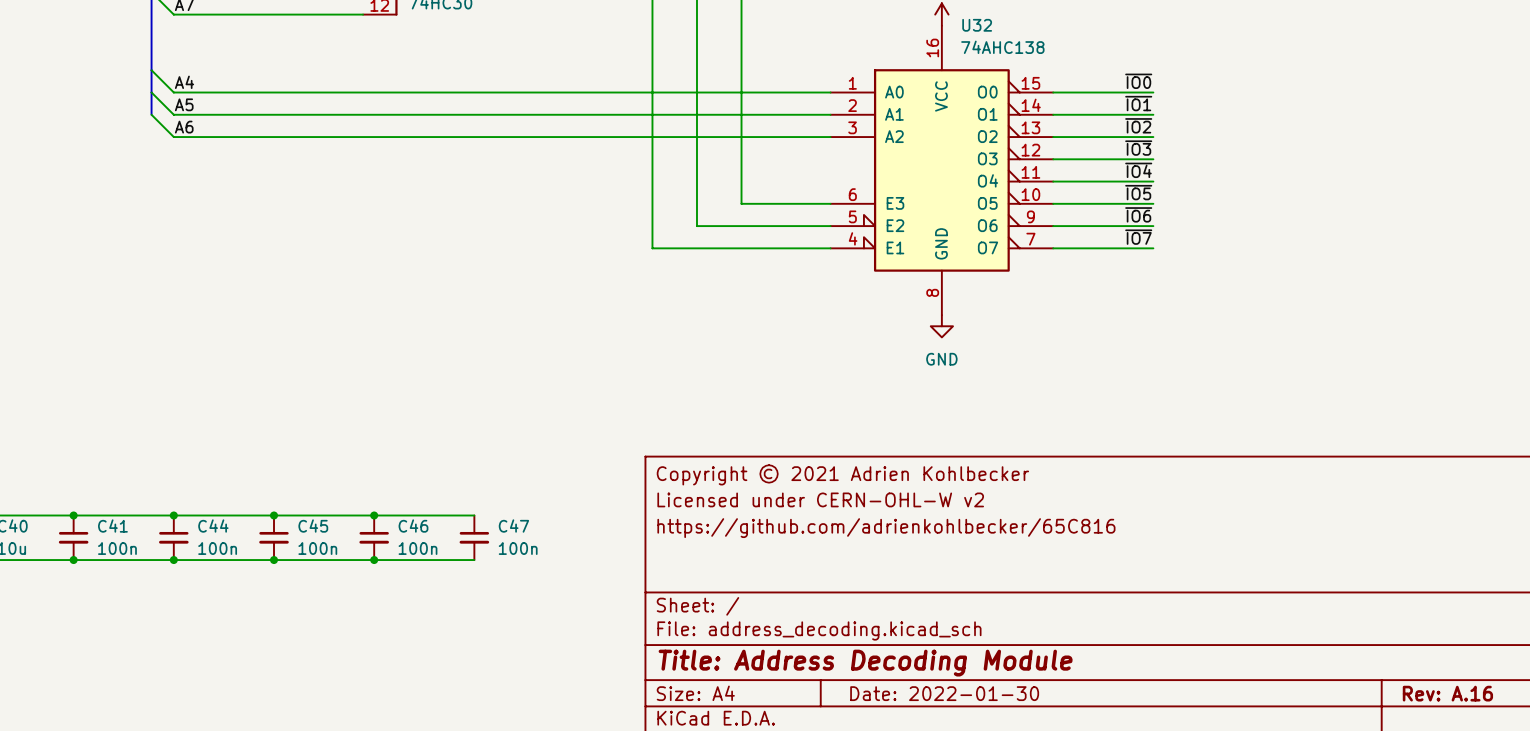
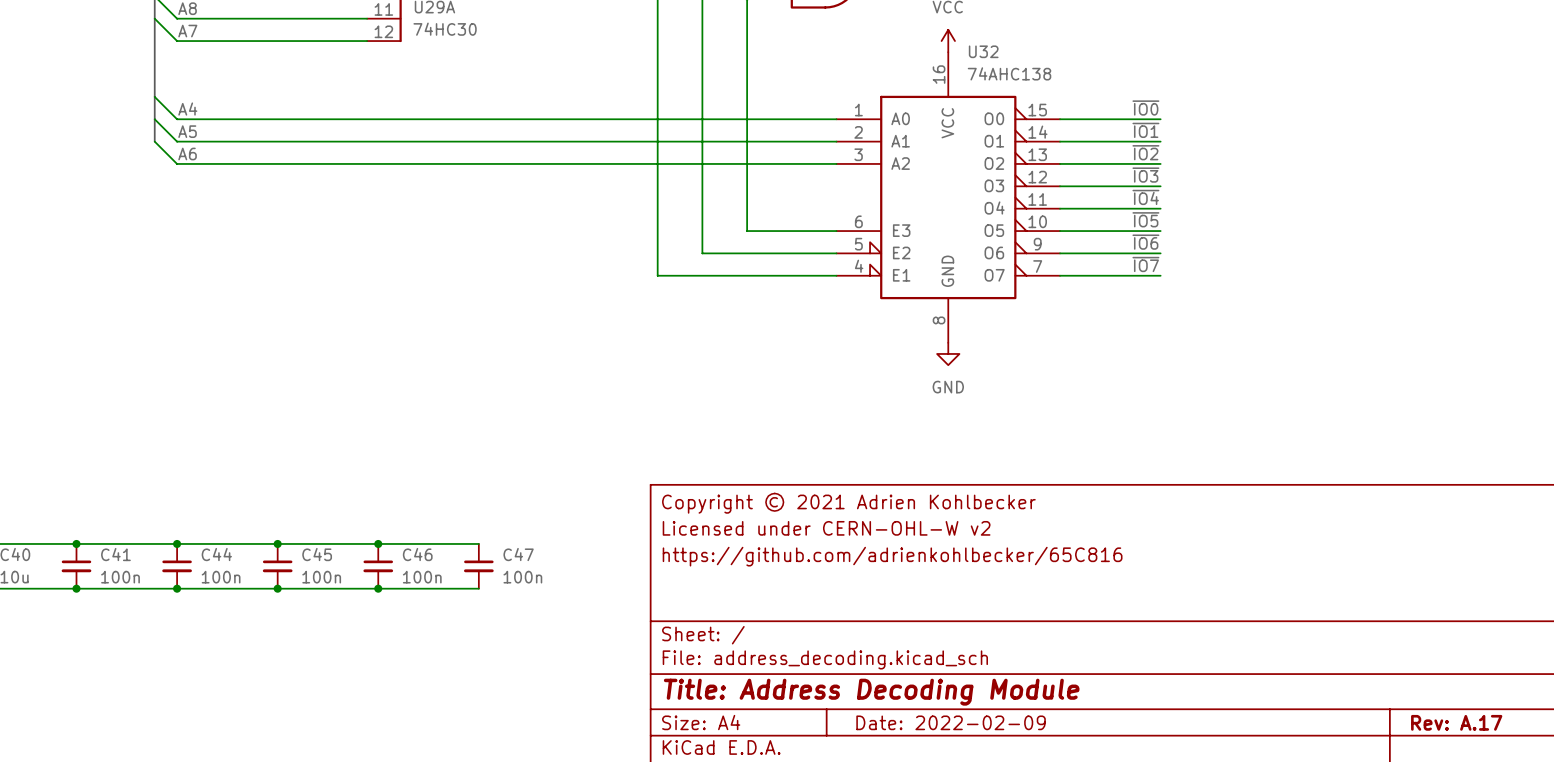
title block: Date: 2022-01-30 (944, 693) -> Date: 2022-02-09 (951, 722)
title block: Rev: A.16 (1447, 693) -> Rev: A.17 (1456, 722)

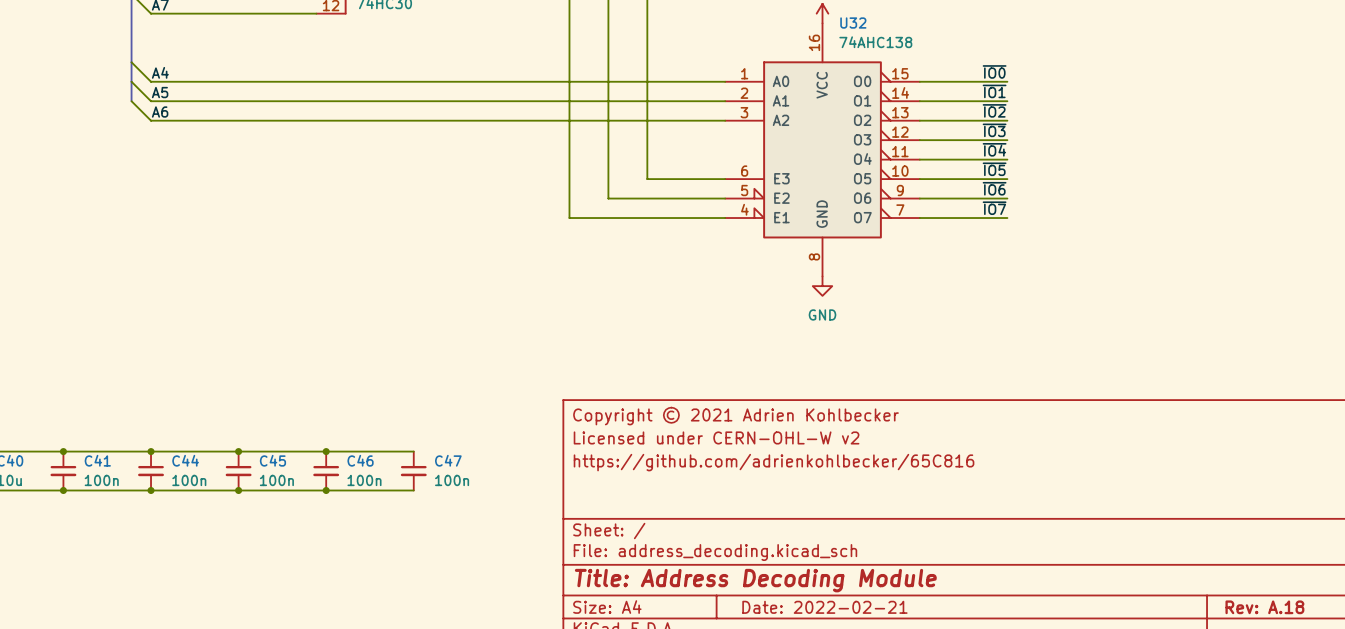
title block: Date: 2022-02-09 (951, 722) -> Date: 2022-02-21 (824, 607)
title block: Rev: A.17 (1456, 722) -> Rev: A.18 (1264, 607)

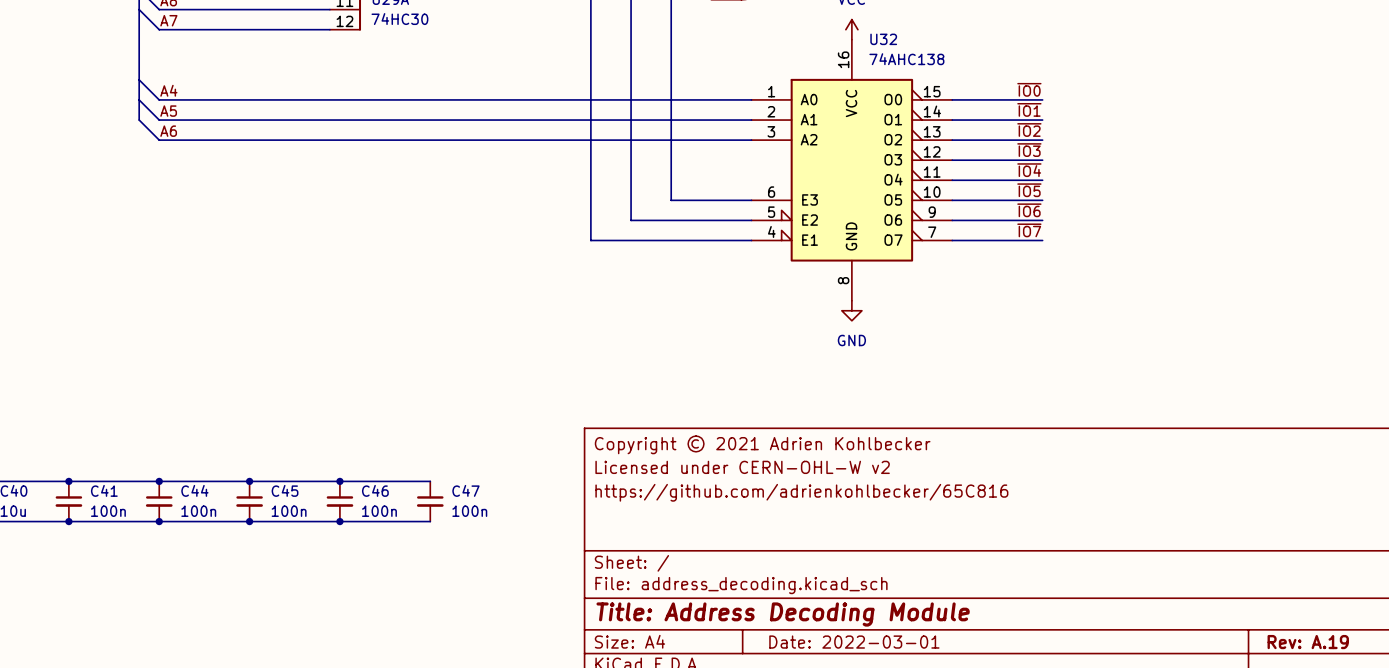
title block: Date: 2022-02-21 (824, 607) -> Date: 2022-03-01 (854, 642)
title block: Rev: A.18 (1264, 607) -> Rev: A.19 (1308, 642)

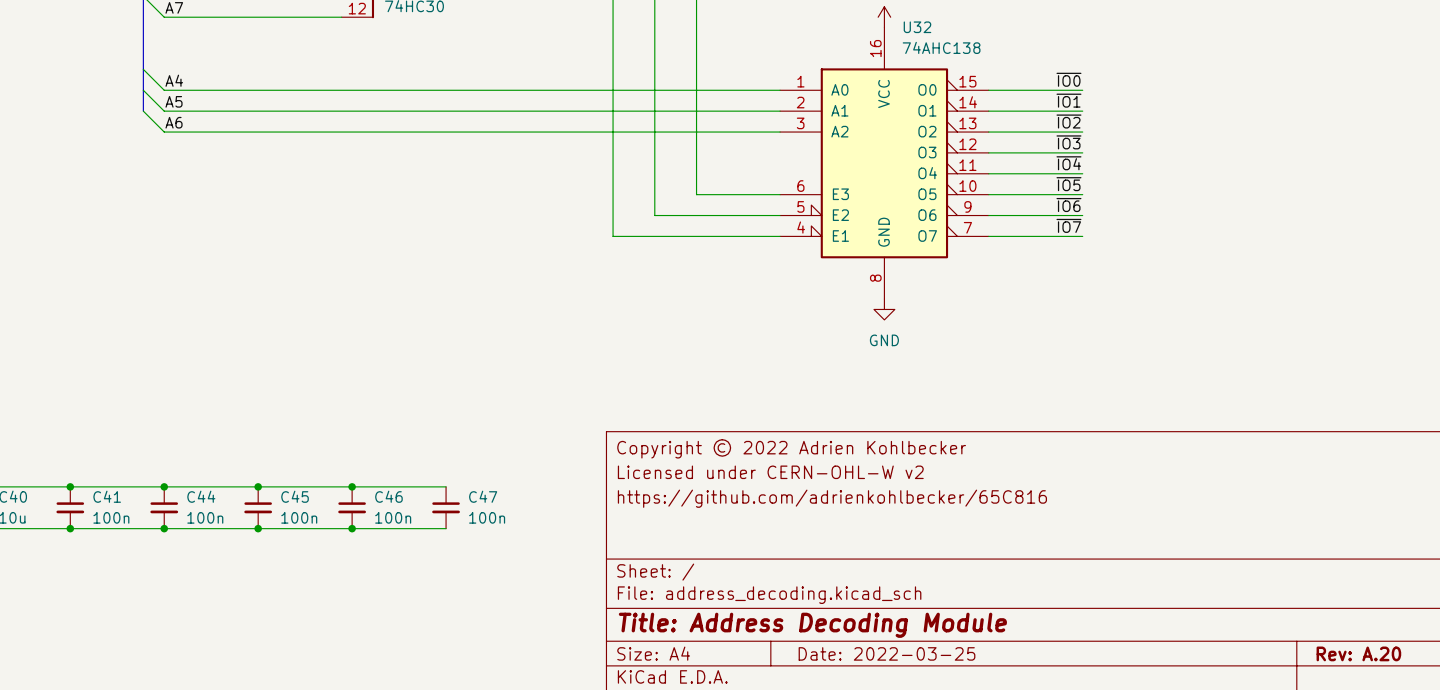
title block: Copyright © 2021 Adrien Kohlbecker (762, 444) -> Copyright © 2022 Adrien Kohlbecker (791, 448)
title block: Date: 2022-03-01 (854, 642) -> Date: 2022-03-25 (887, 653)
title block: Rev: A.19 (1308, 642) -> Rev: A.20 (1358, 653)

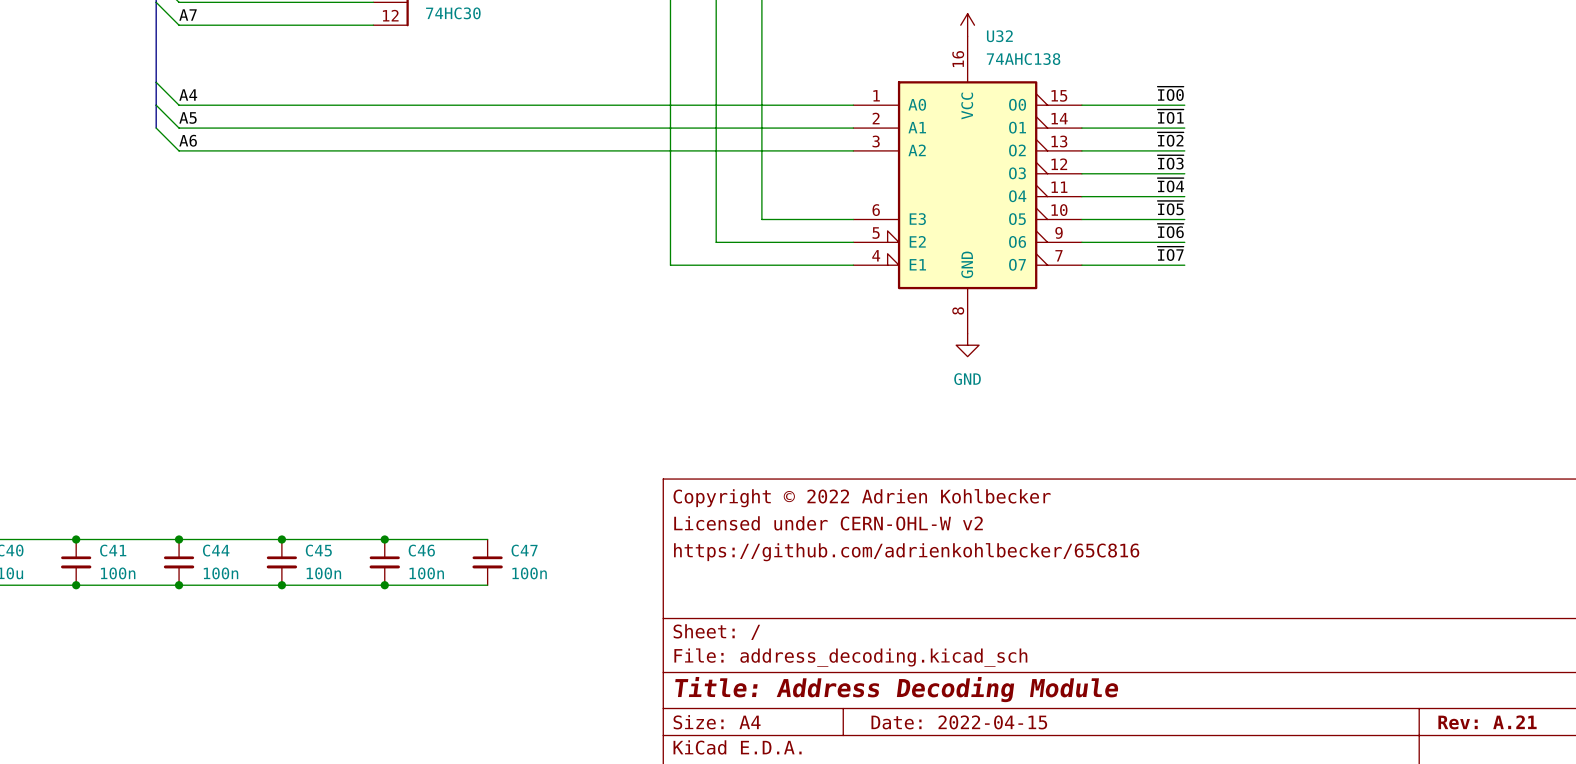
title block: Date: 2022-03-25 (887, 653) -> Date: 2022-04-15 (959, 722)
title block: Rev: A.20 (1358, 653) -> Rev: A.21 (1487, 722)

